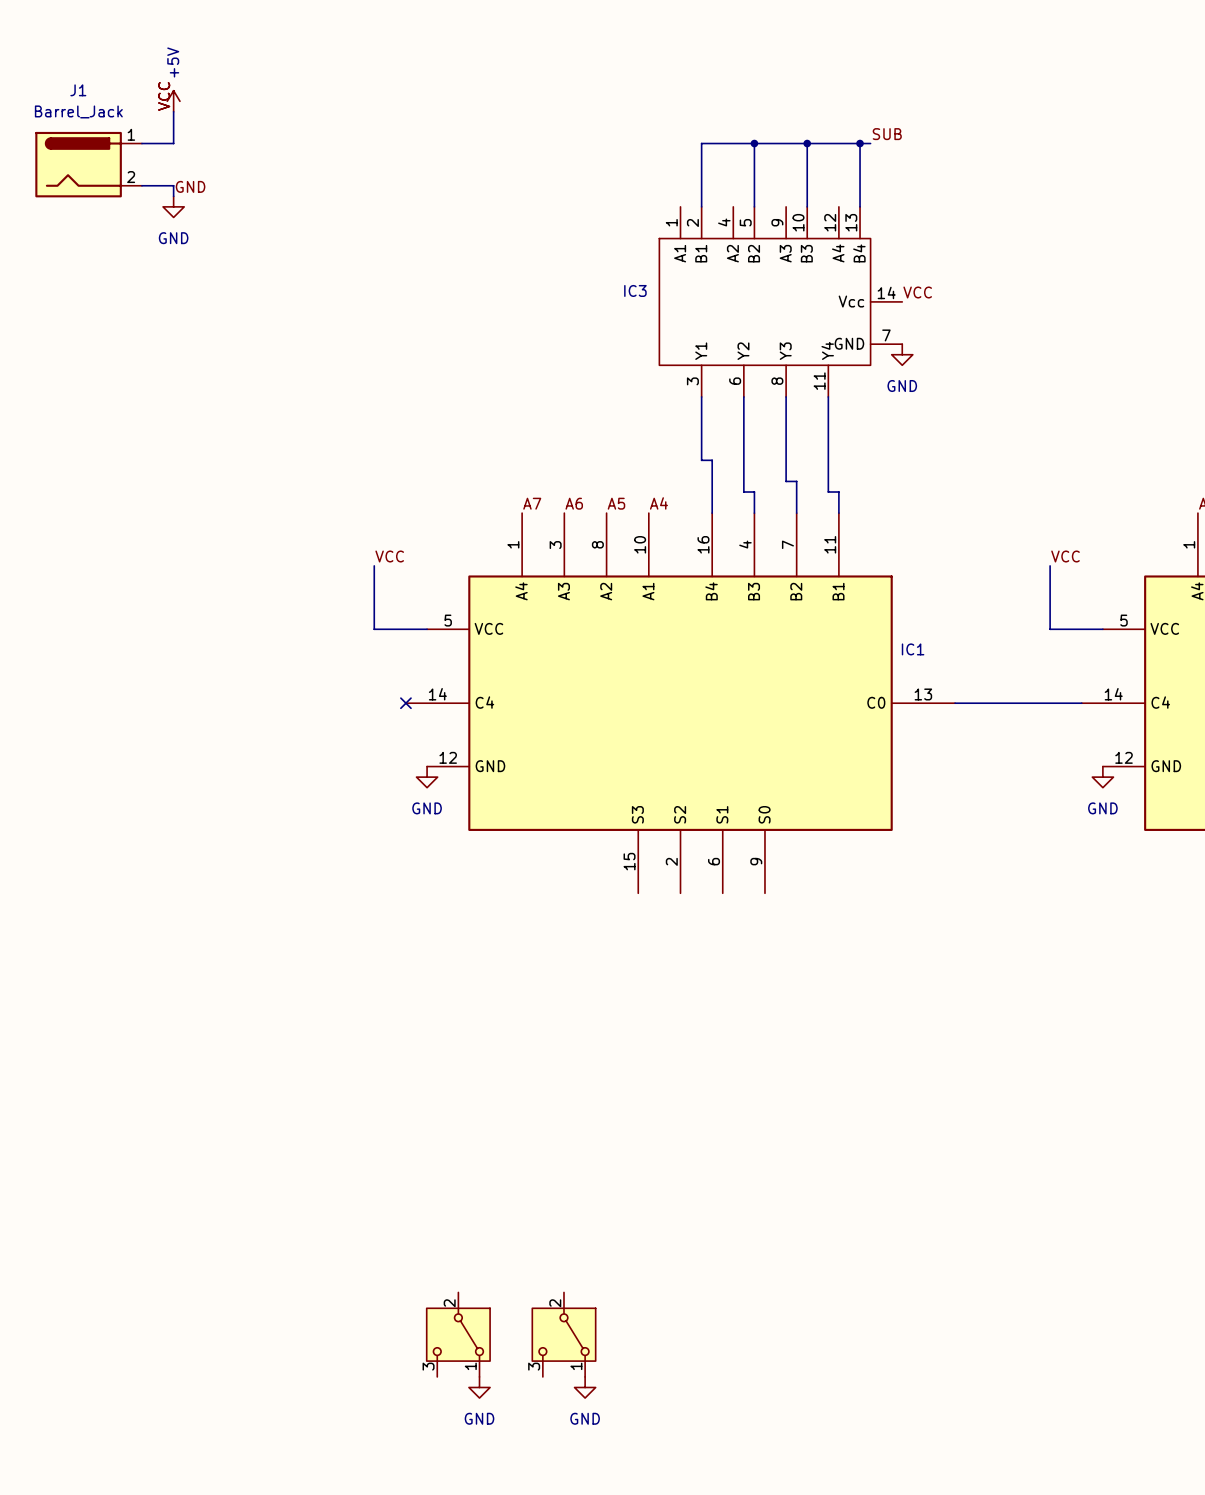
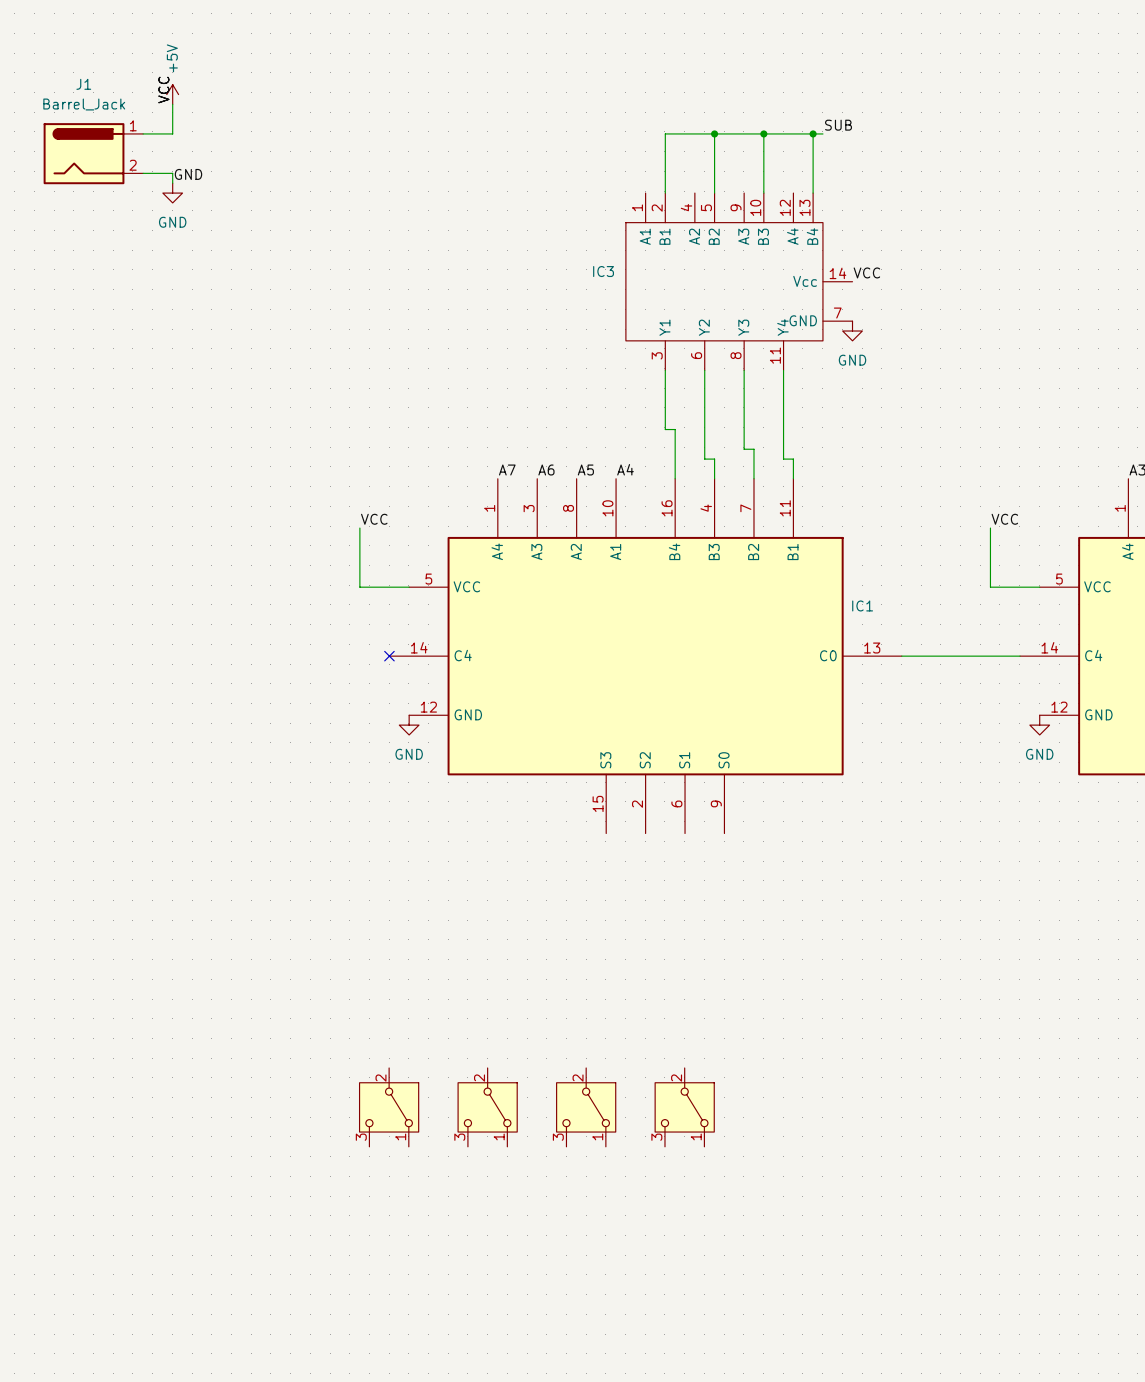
part: none -> (389, 1107)
part: none -> (487, 1107)
part: none -> (586, 1107)
part: none -> (684, 1107)
part: (458, 1334) -> none
part: (563, 1334) -> none
power symbol: GND (479, 1387) -> none
power symbol: GND (585, 1387) -> none

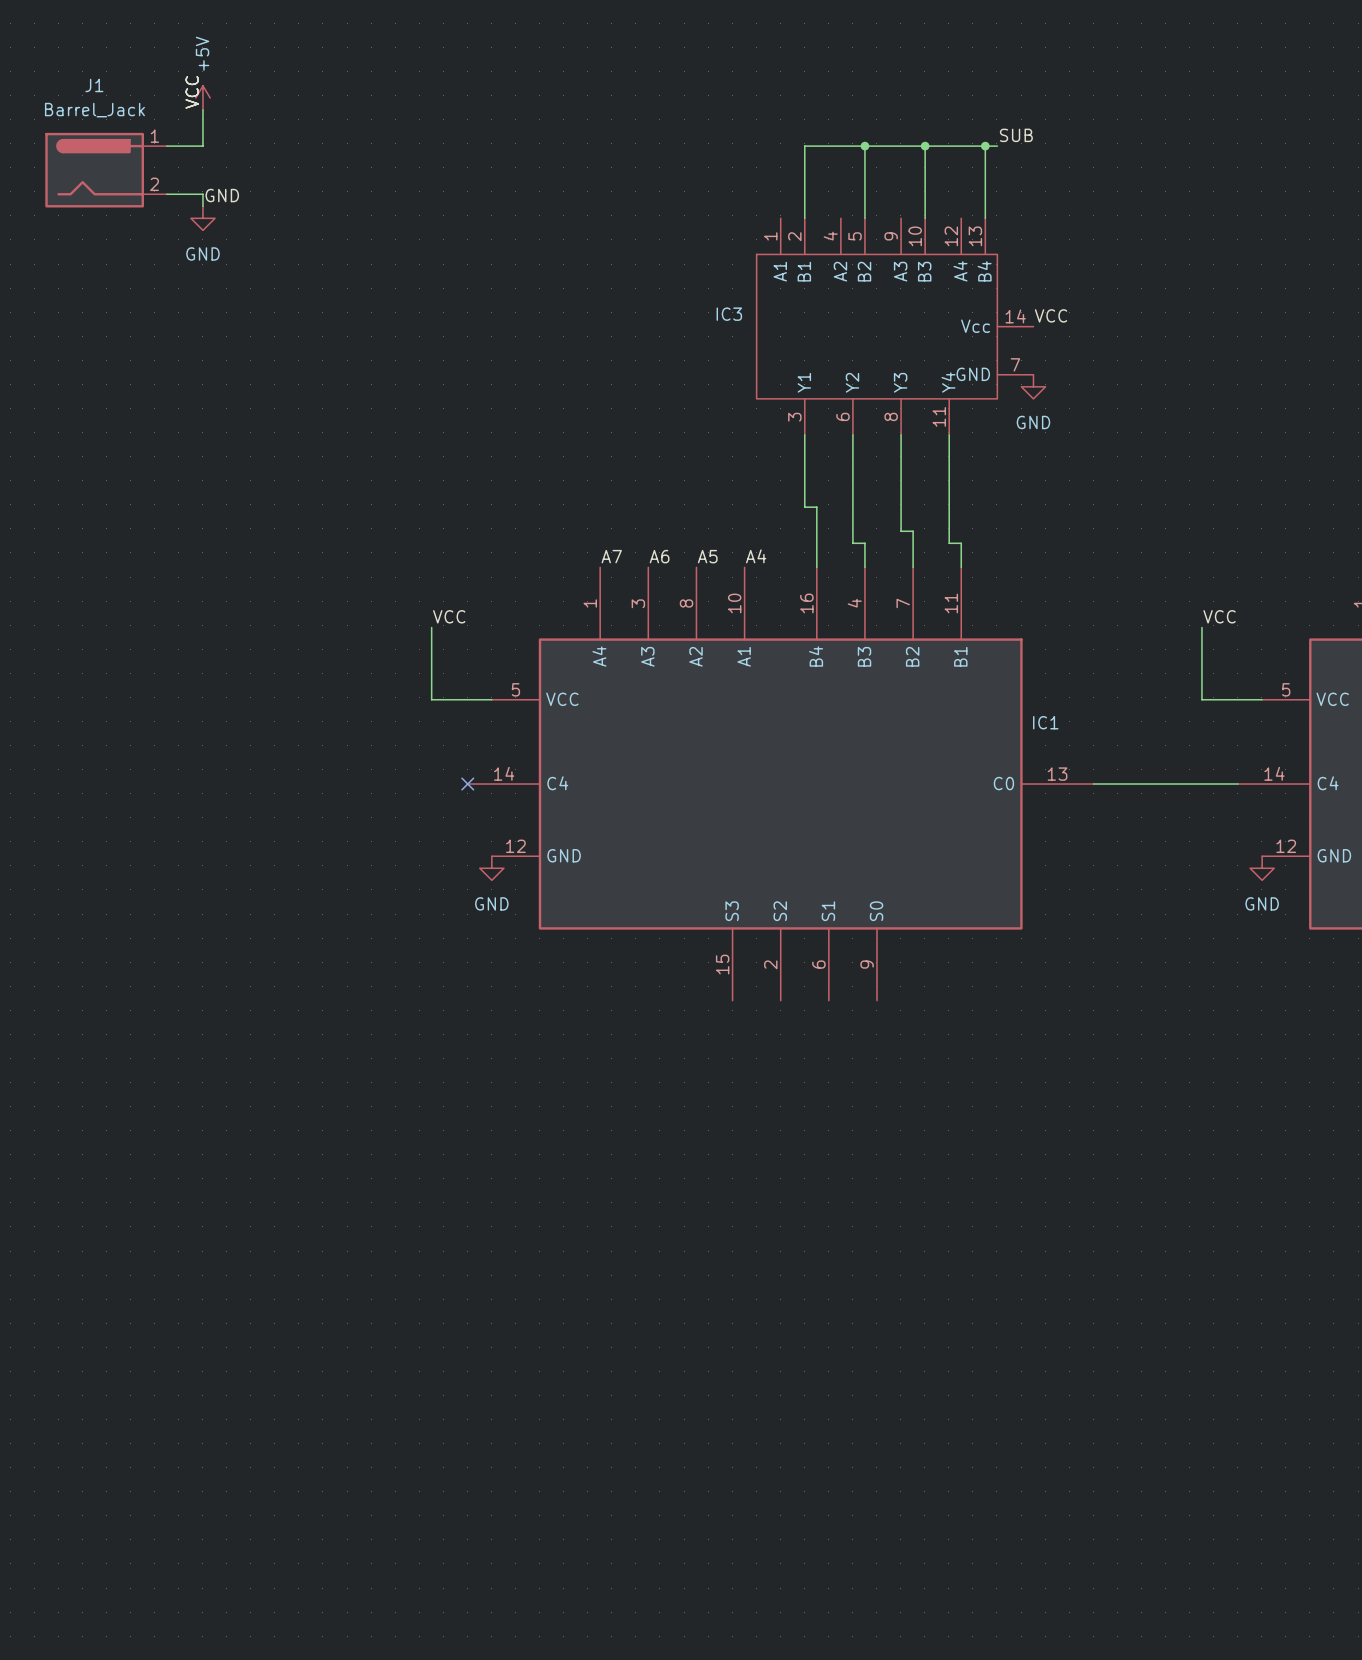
part: (389, 1107) -> none
part: (487, 1107) -> none
part: (586, 1107) -> none
part: (684, 1107) -> none

